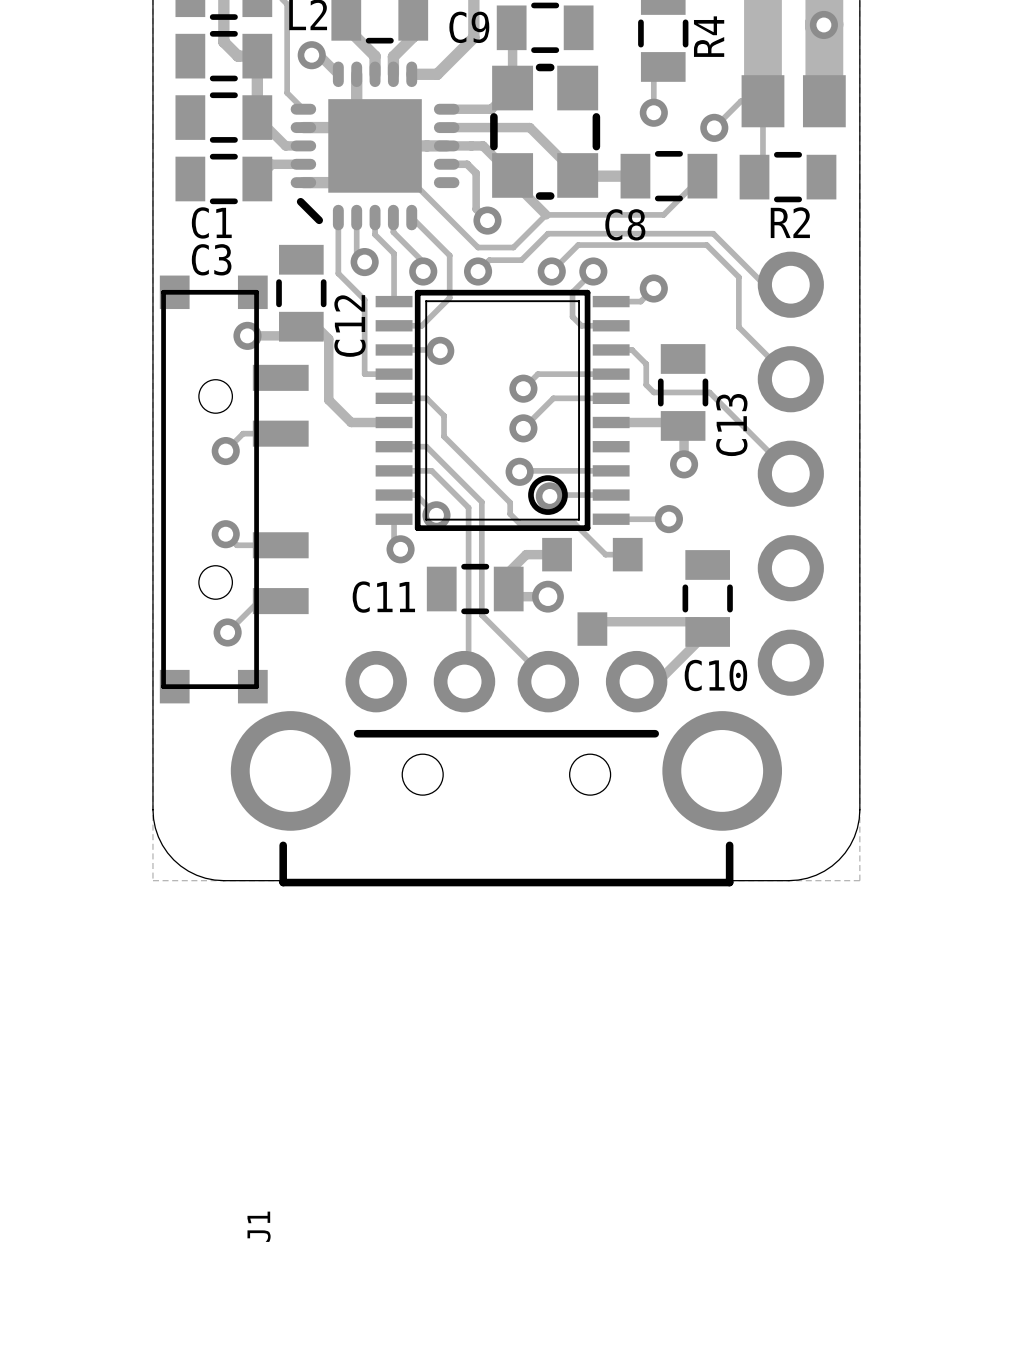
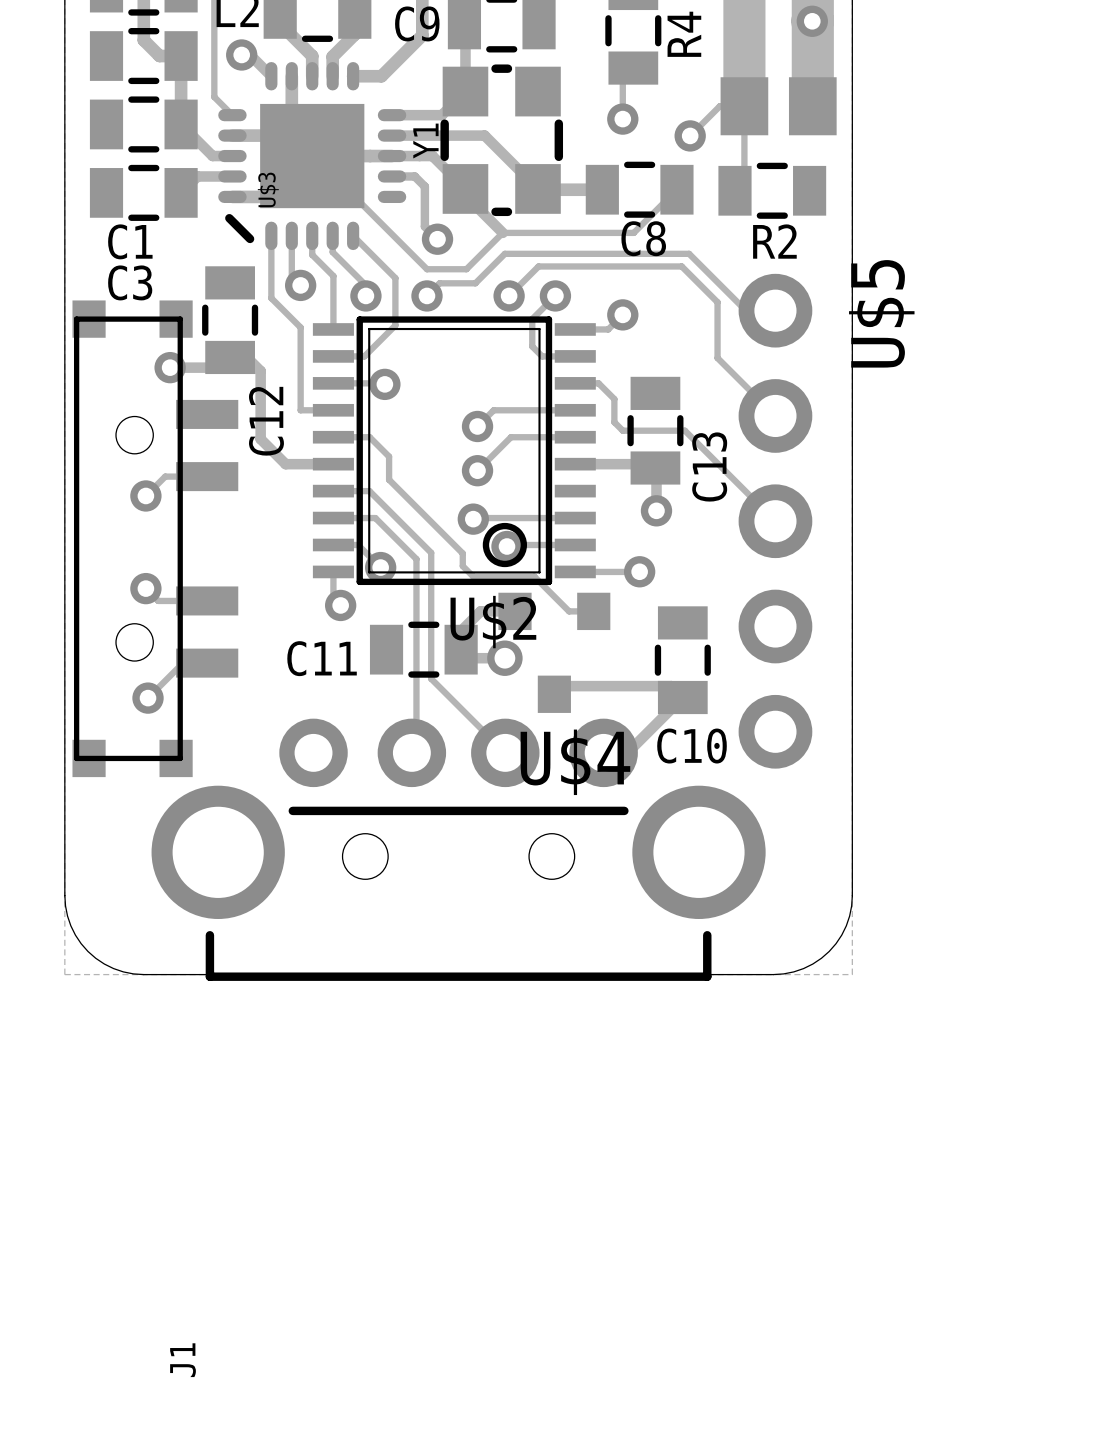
Y1 name: none -> Y1 (425, 141)
U$3 name: none -> U$3 (268, 189)
C8 name position: C8 (625, 224) -> C8 (643, 238)
U$5 name: none -> U$5 (881, 313)
C12 name position: C12 (350, 325) -> C12 (266, 421)
U$2 name: none -> U$2 (493, 622)
U$4 name: none -> U$4 (575, 762)

